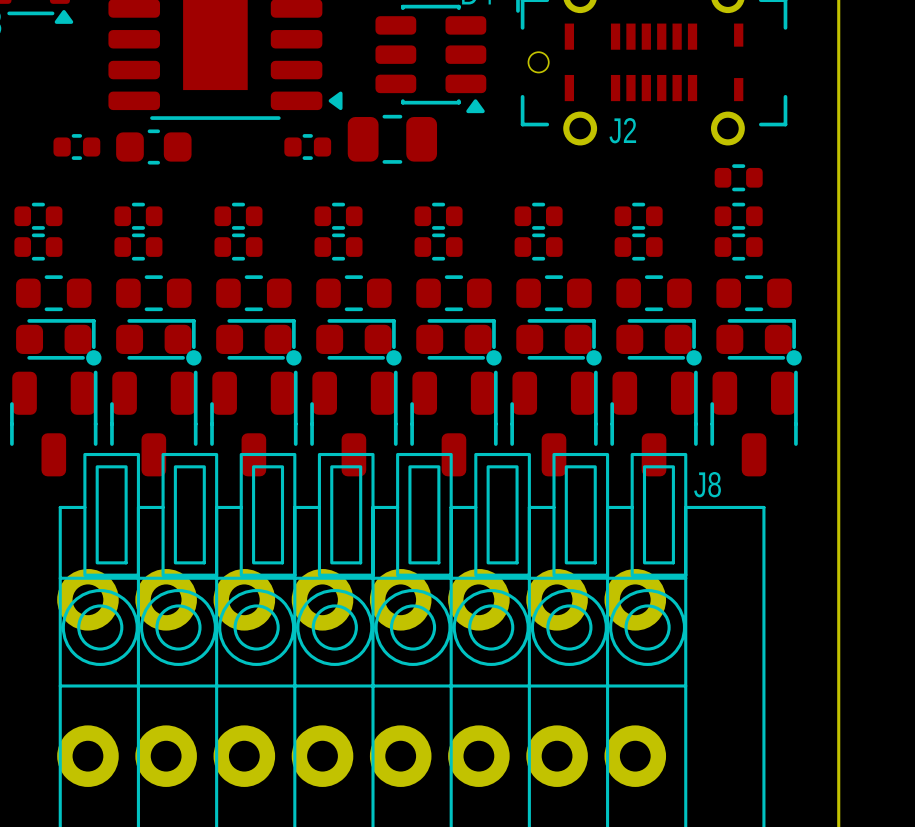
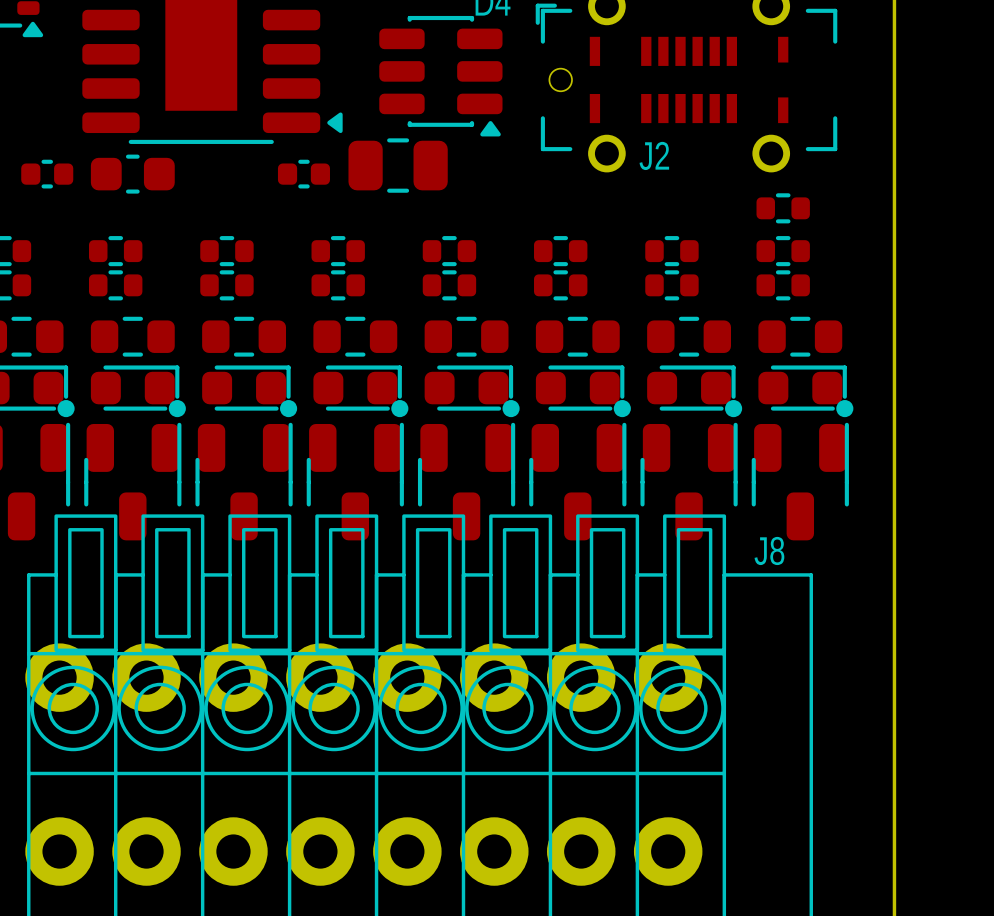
J8 name position: J8 (707, 484) -> J8 (769, 550)

